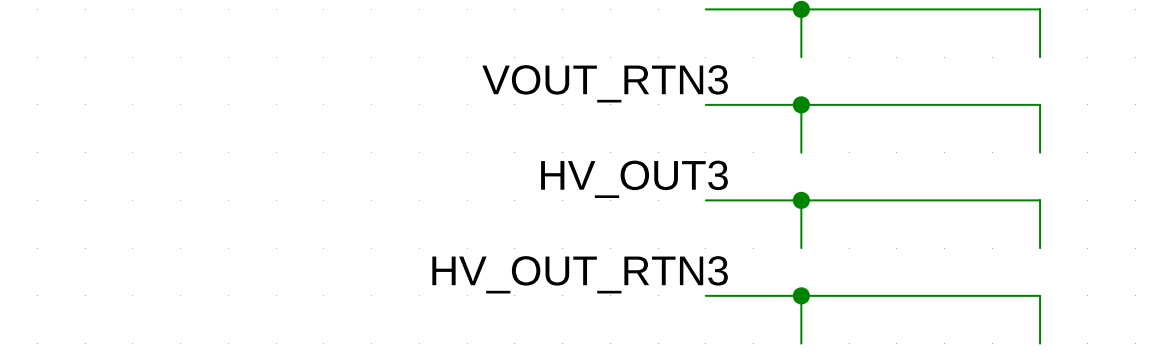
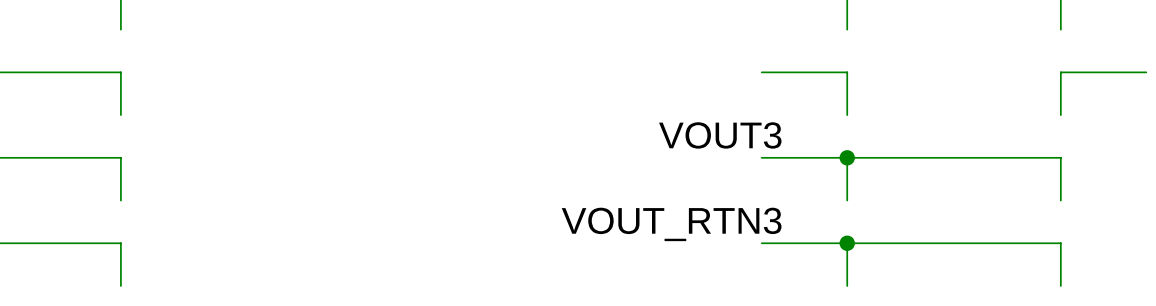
label: VOUT_RTN3 (605, 83) -> none
wire: (801, 104) (1040, 104) -> (1146, 72) (1060, 72)
junction: (801, 104) -> none
label: HV_OUT3 (634, 179) -> VOUT3 (720, 135)
label: HV_OUT_RTN3 (580, 274) -> VOUT_RTN3 (671, 224)

